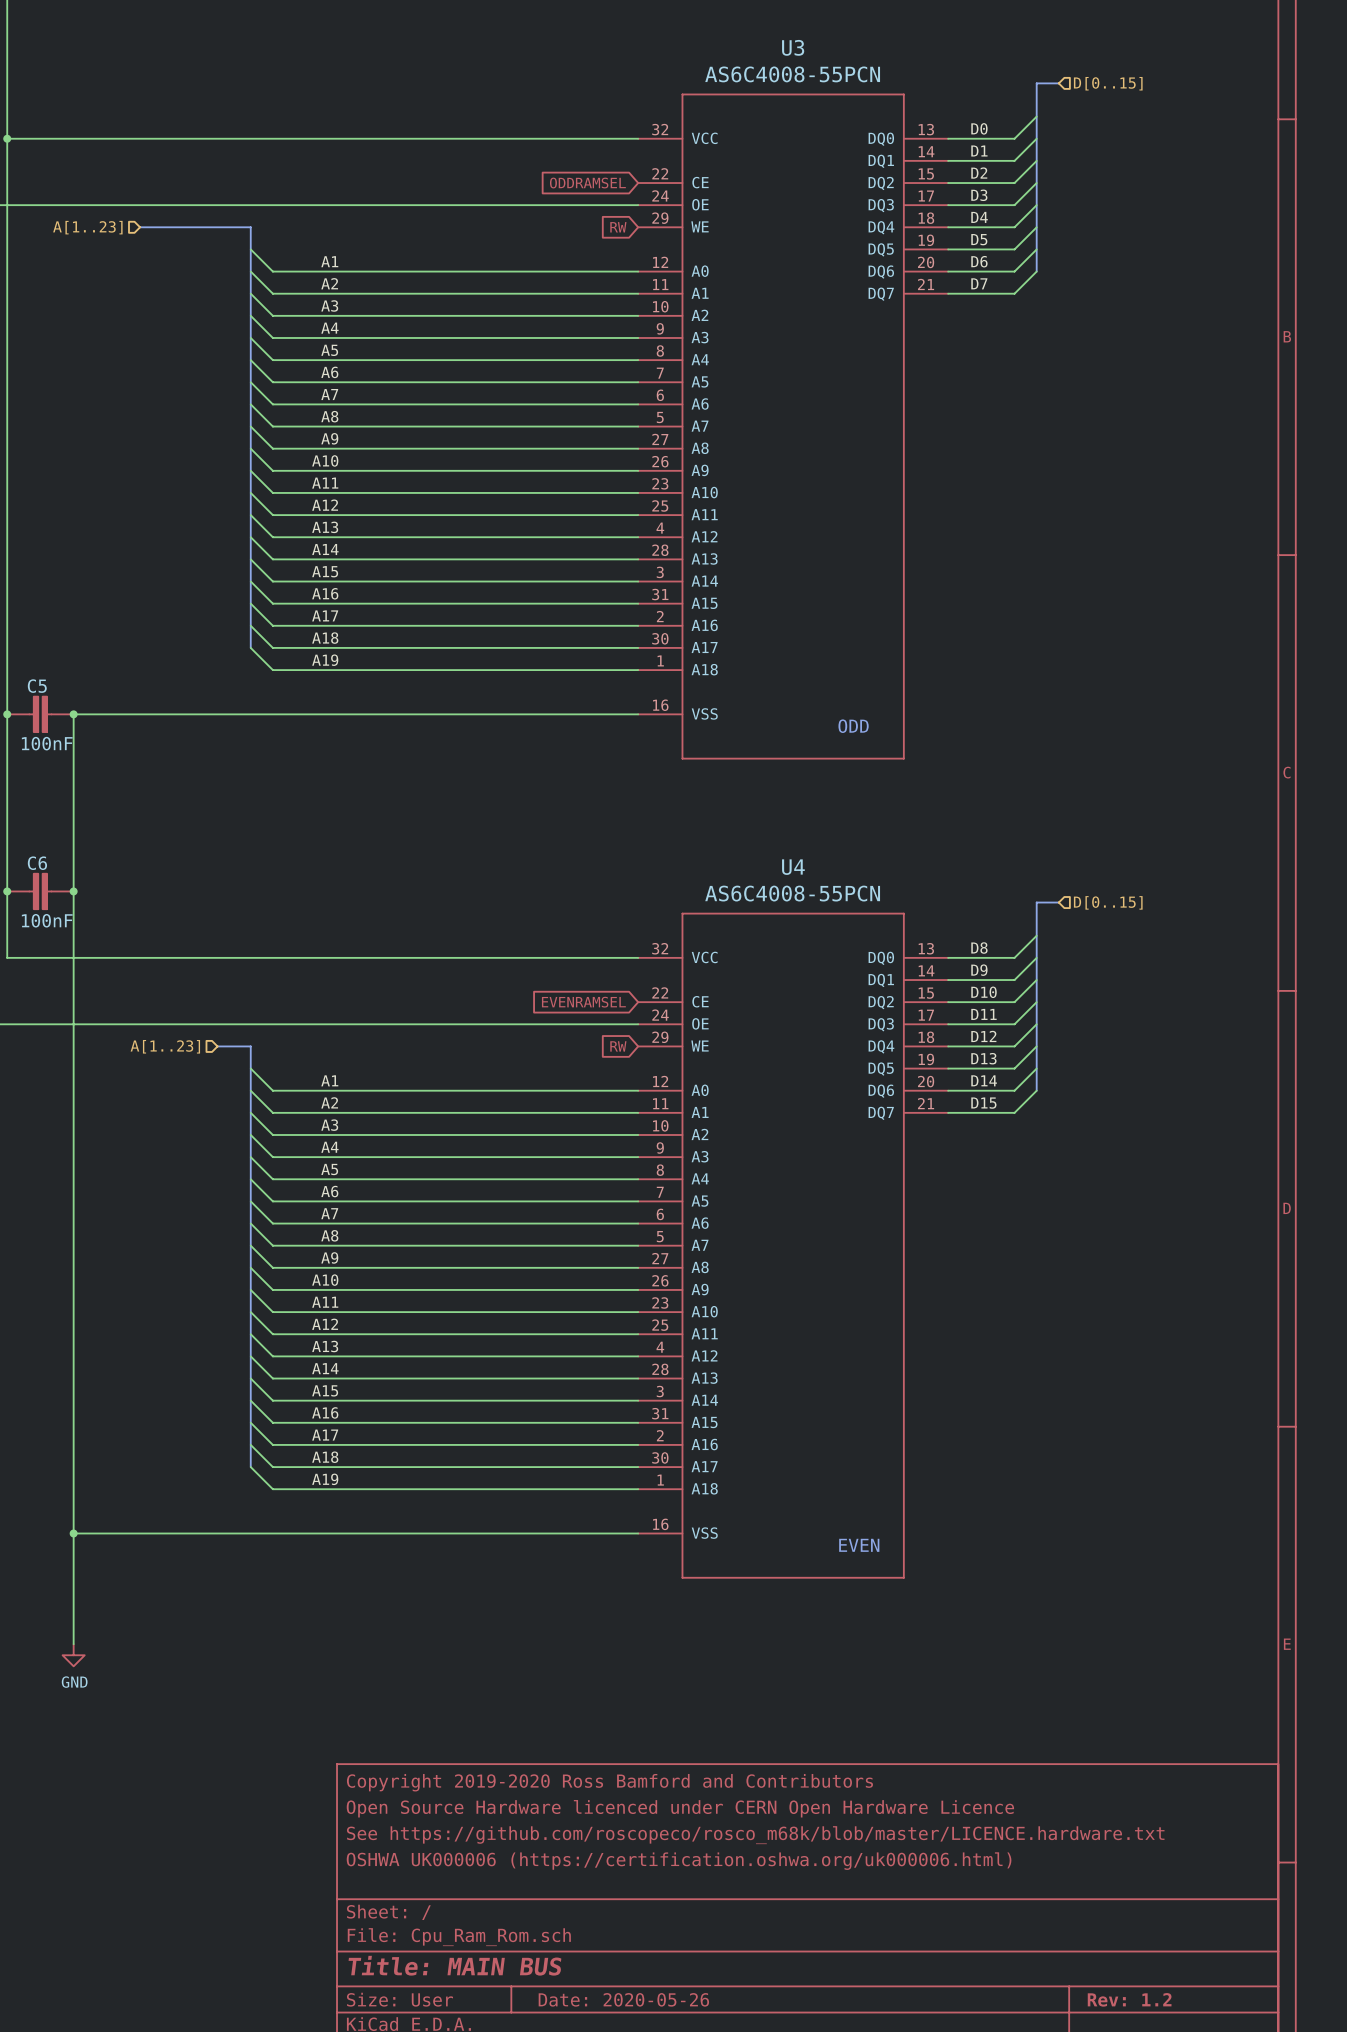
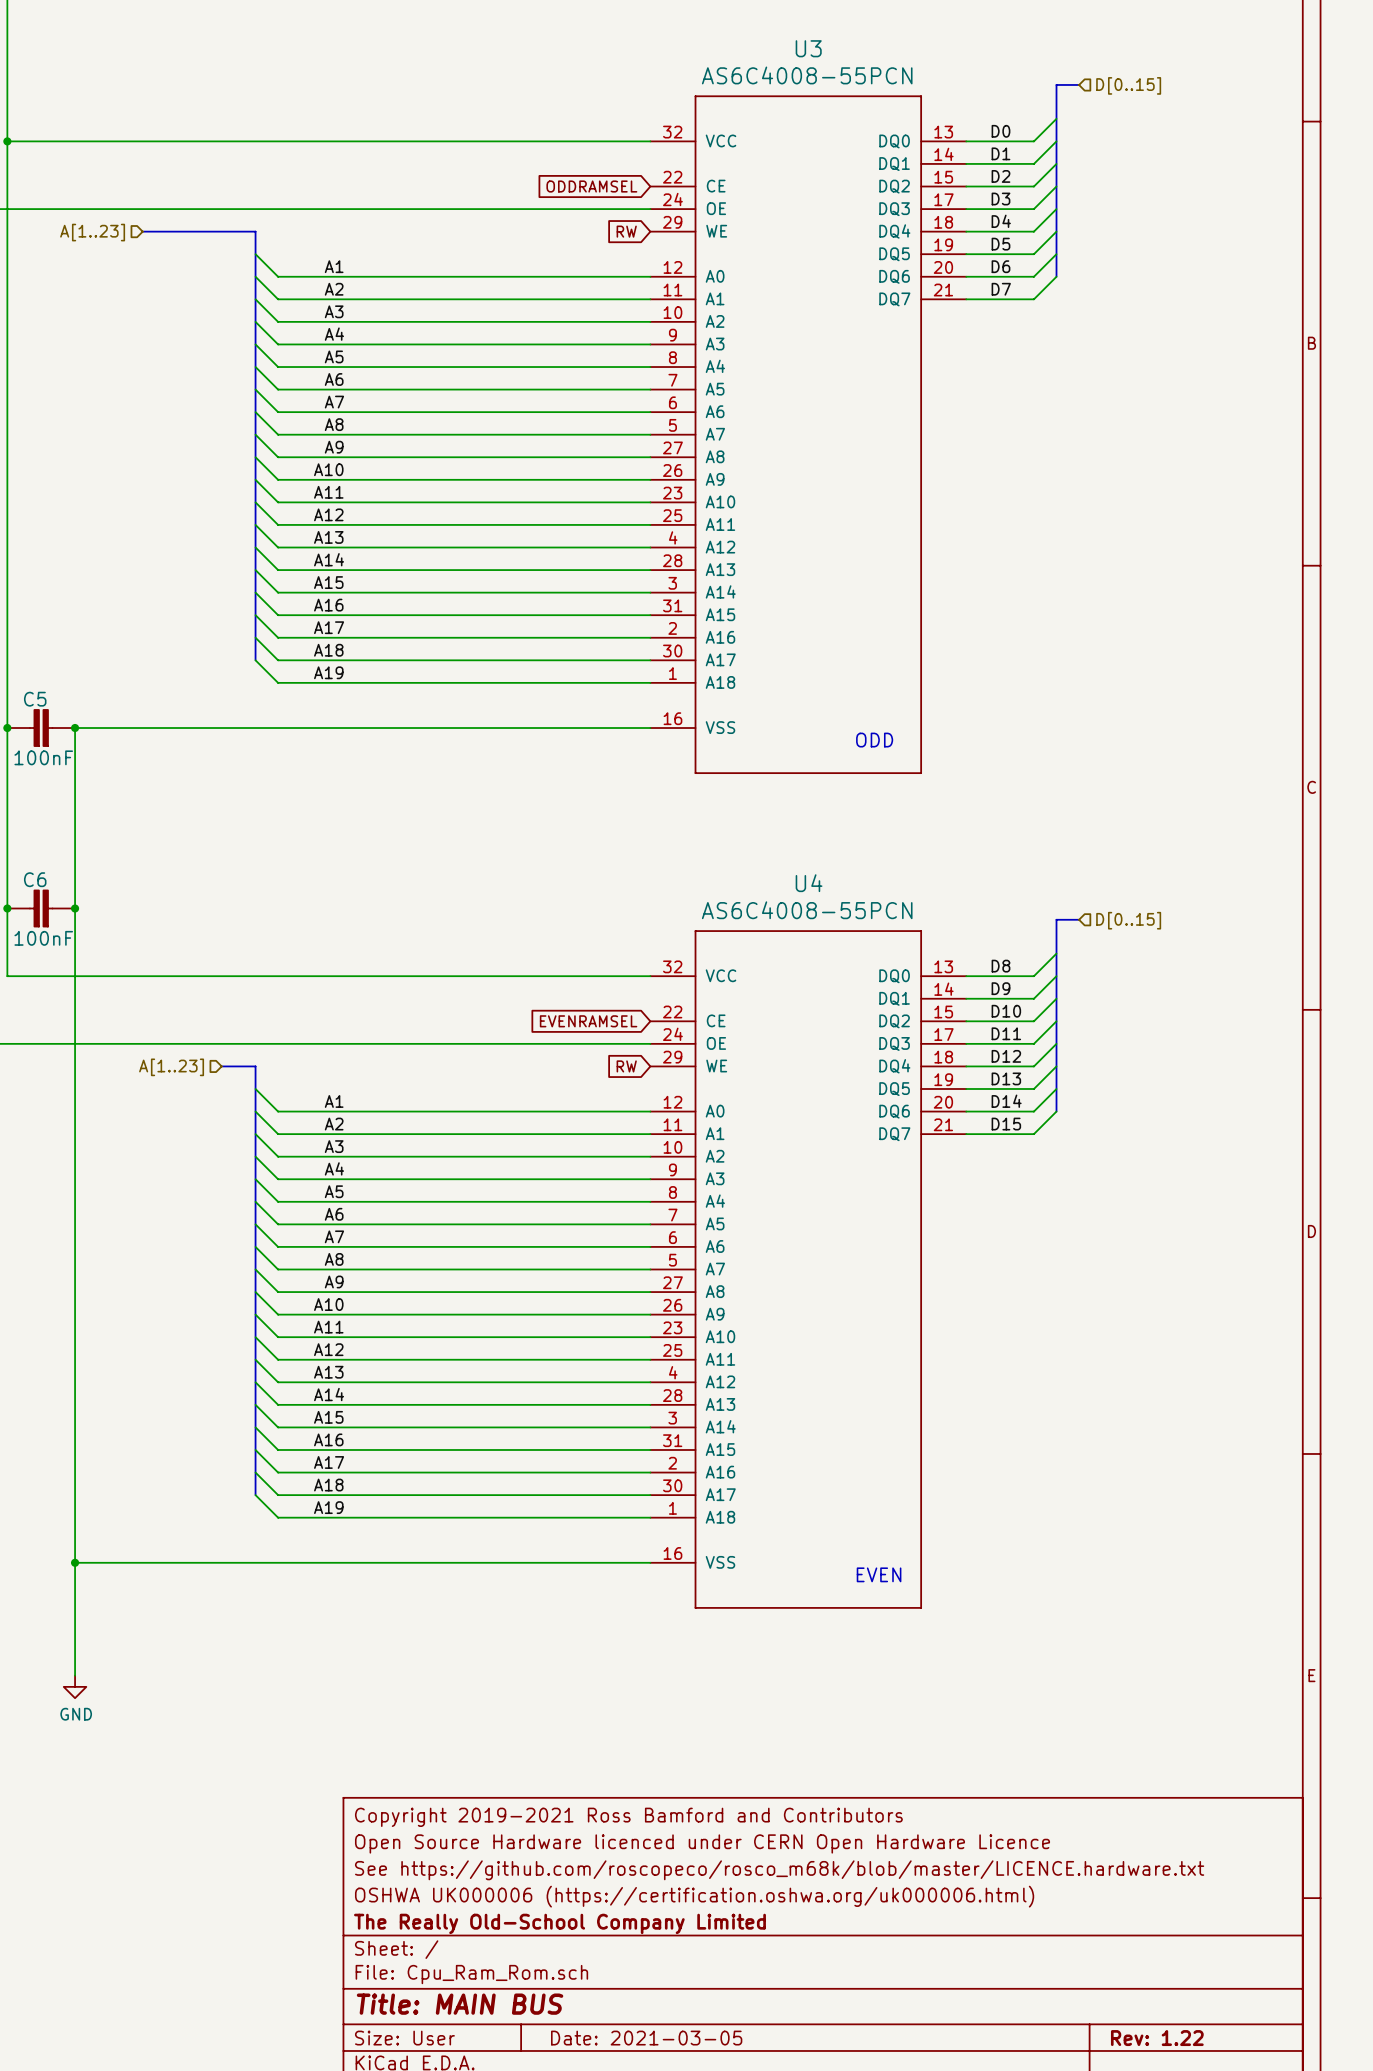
title block: Copyright 2019-2020 Ross Bamford and Contributors (609, 1782) -> Copyright 2019-2021 Ross Bamford and Contributors (628, 1817)
title block: none -> The Really Old-School Company Limited (559, 1923)
title block: Date: 2020-05-26 (623, 1999) -> Date: 2021-03-05 (646, 2038)
title block: Rev: 1.2 (1129, 1999) -> Rev: 1.22 (1157, 2038)

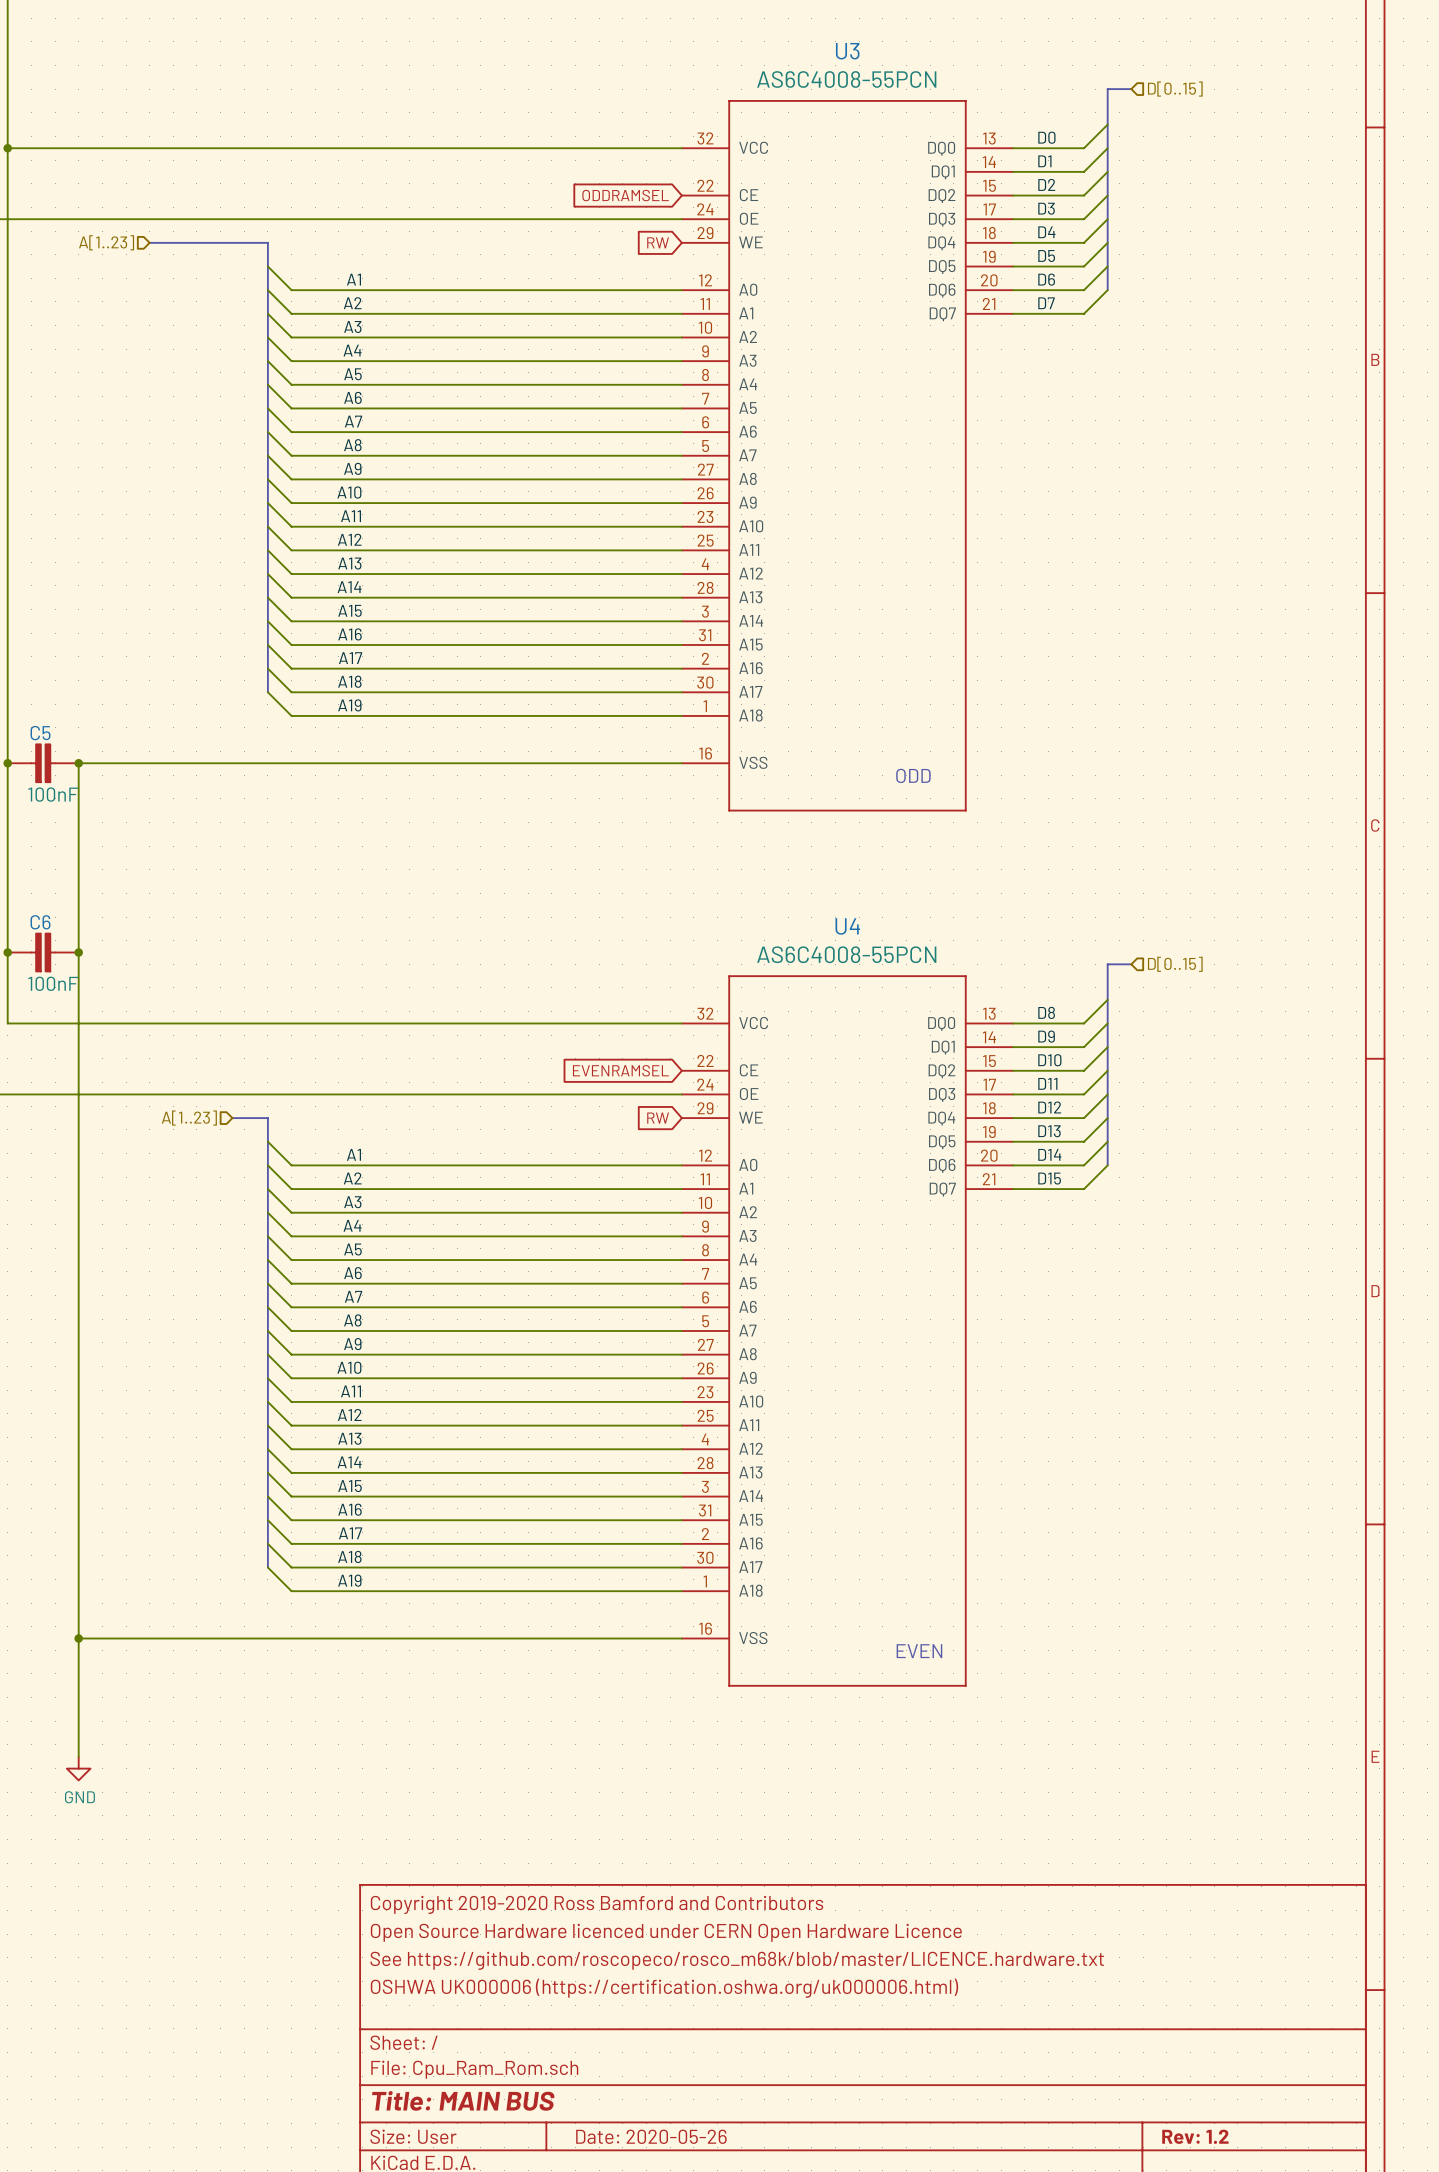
title block: Copyright 2019-2021 Ross Bamford and Contributors (628, 1817) -> Copyright 2019-2020 Ross Bamford and Contributors (597, 1904)
title block: The Really Old-School Company Limited (559, 1923) -> none
title block: Date: 2021-03-05 (646, 2038) -> Date: 2020-05-26 (651, 2136)
title block: Rev: 1.22 (1157, 2038) -> Rev: 1.2 (1195, 2136)

